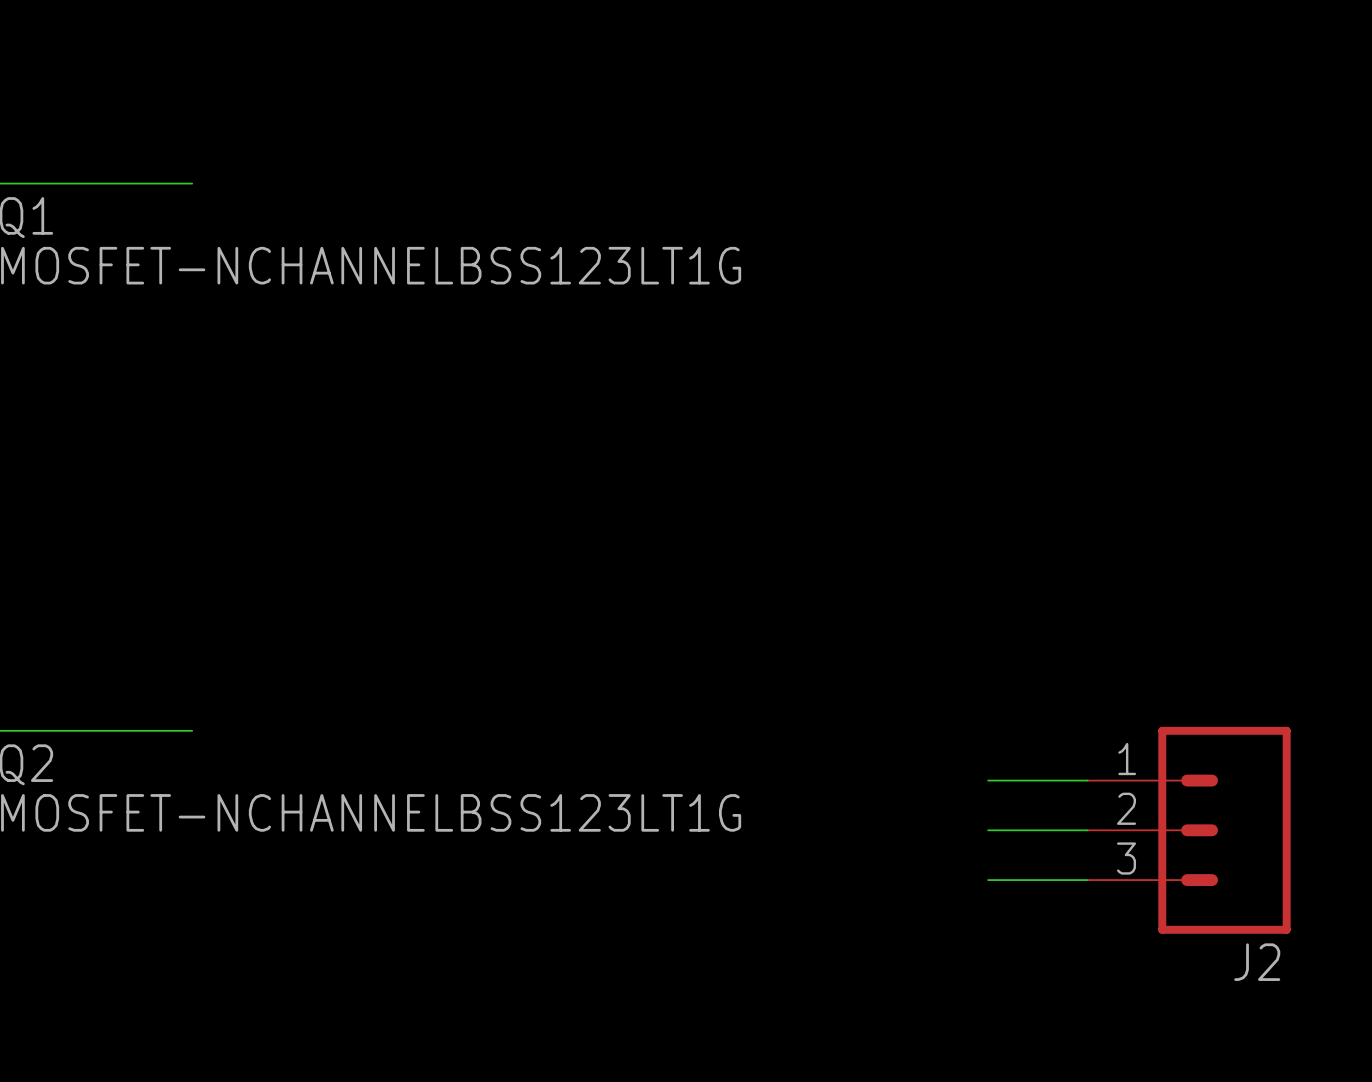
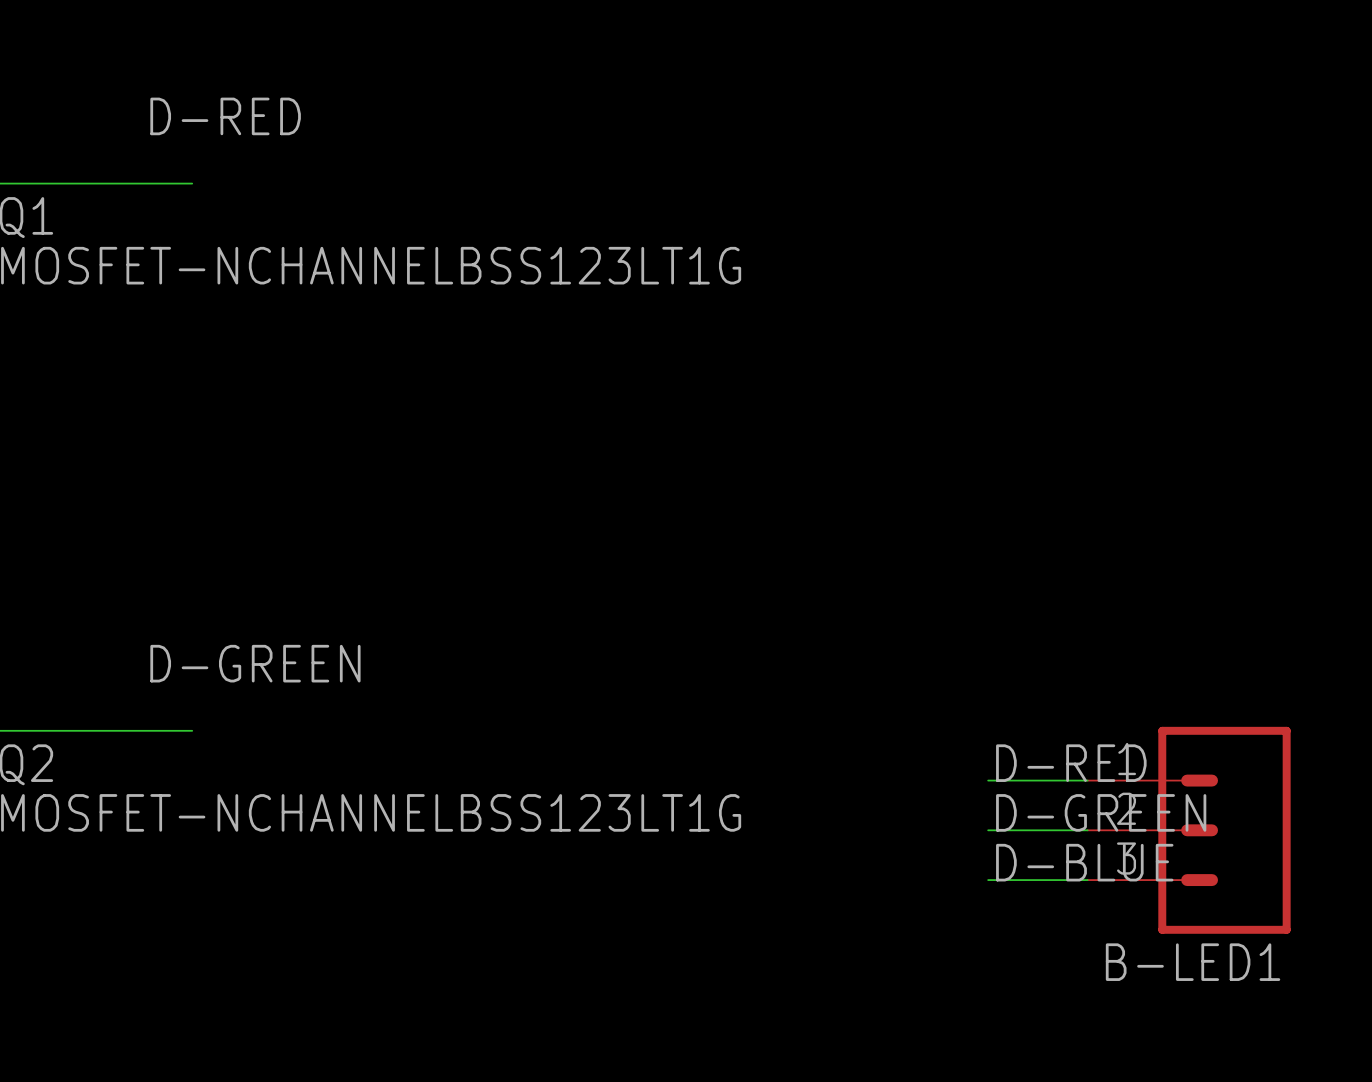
label: none -> D-RED (225, 116)
label: none -> D-GREEN (255, 663)
label: none -> D-RED (1071, 763)
label: none -> D-GREEN (1101, 812)
label: none -> D-BLUE (1084, 862)
J2 name: J2 (1257, 962) -> B-LED1 (1193, 962)

